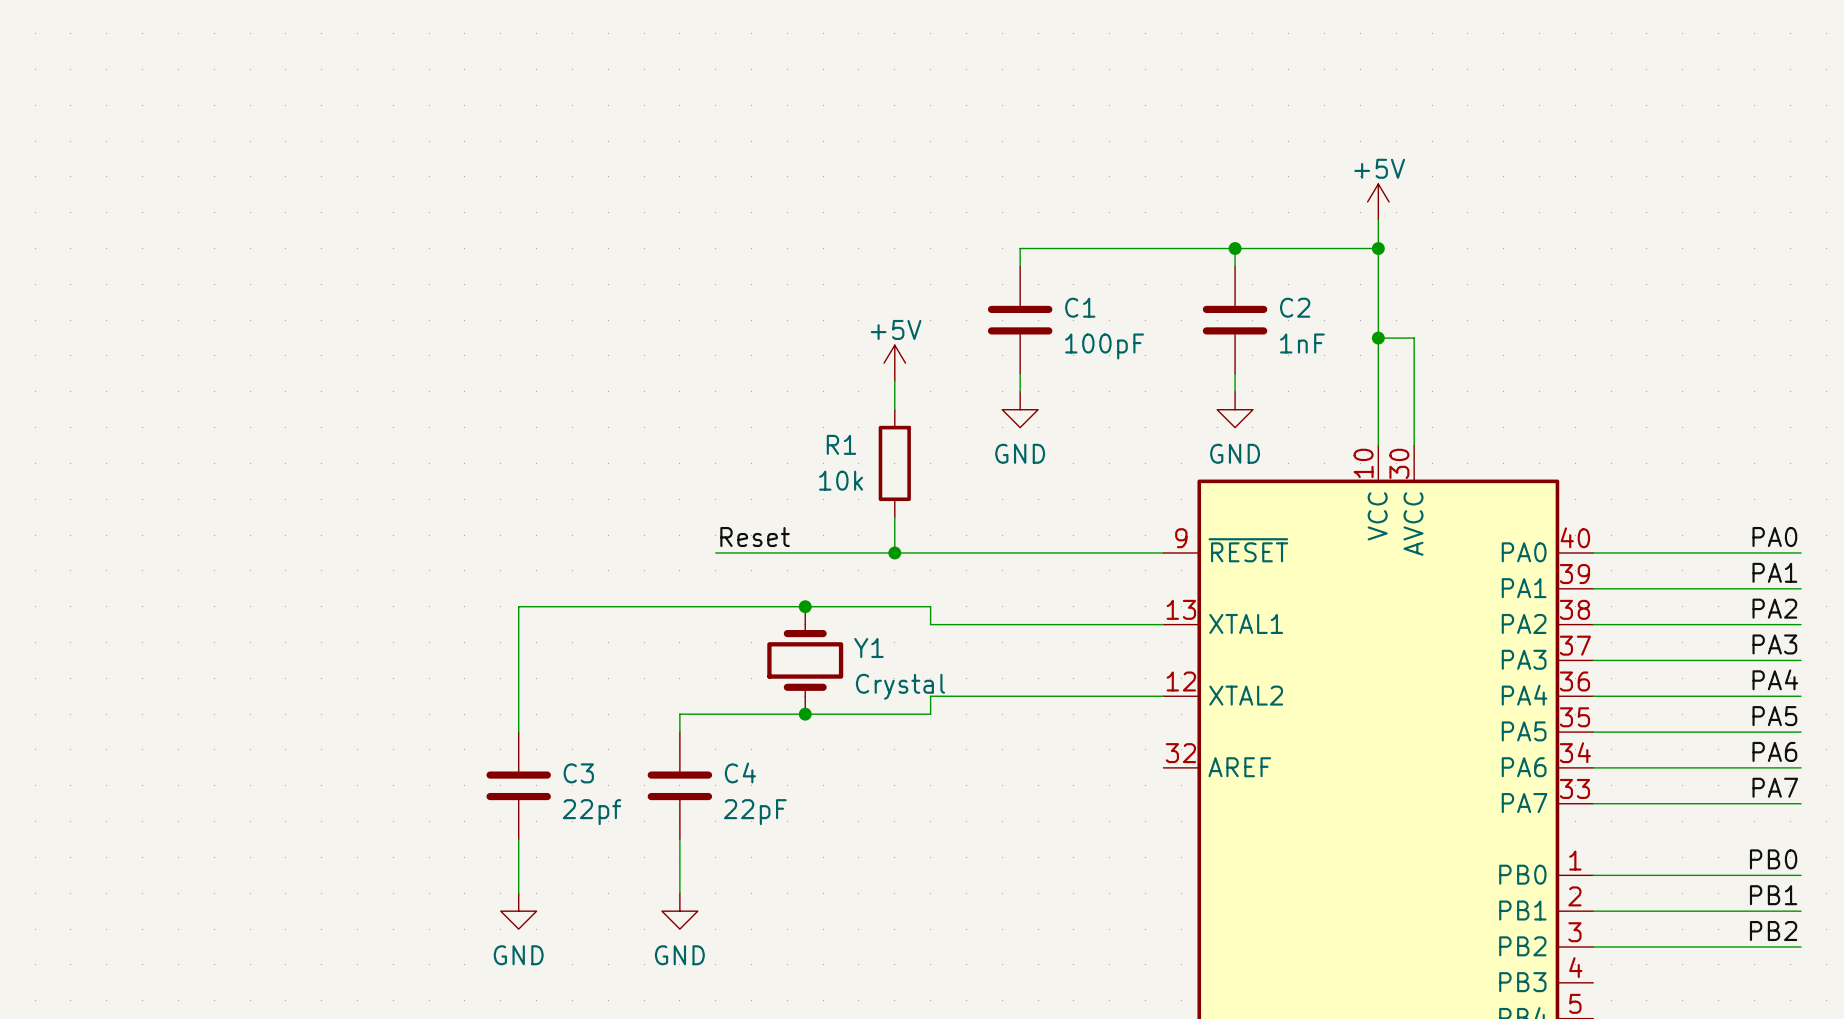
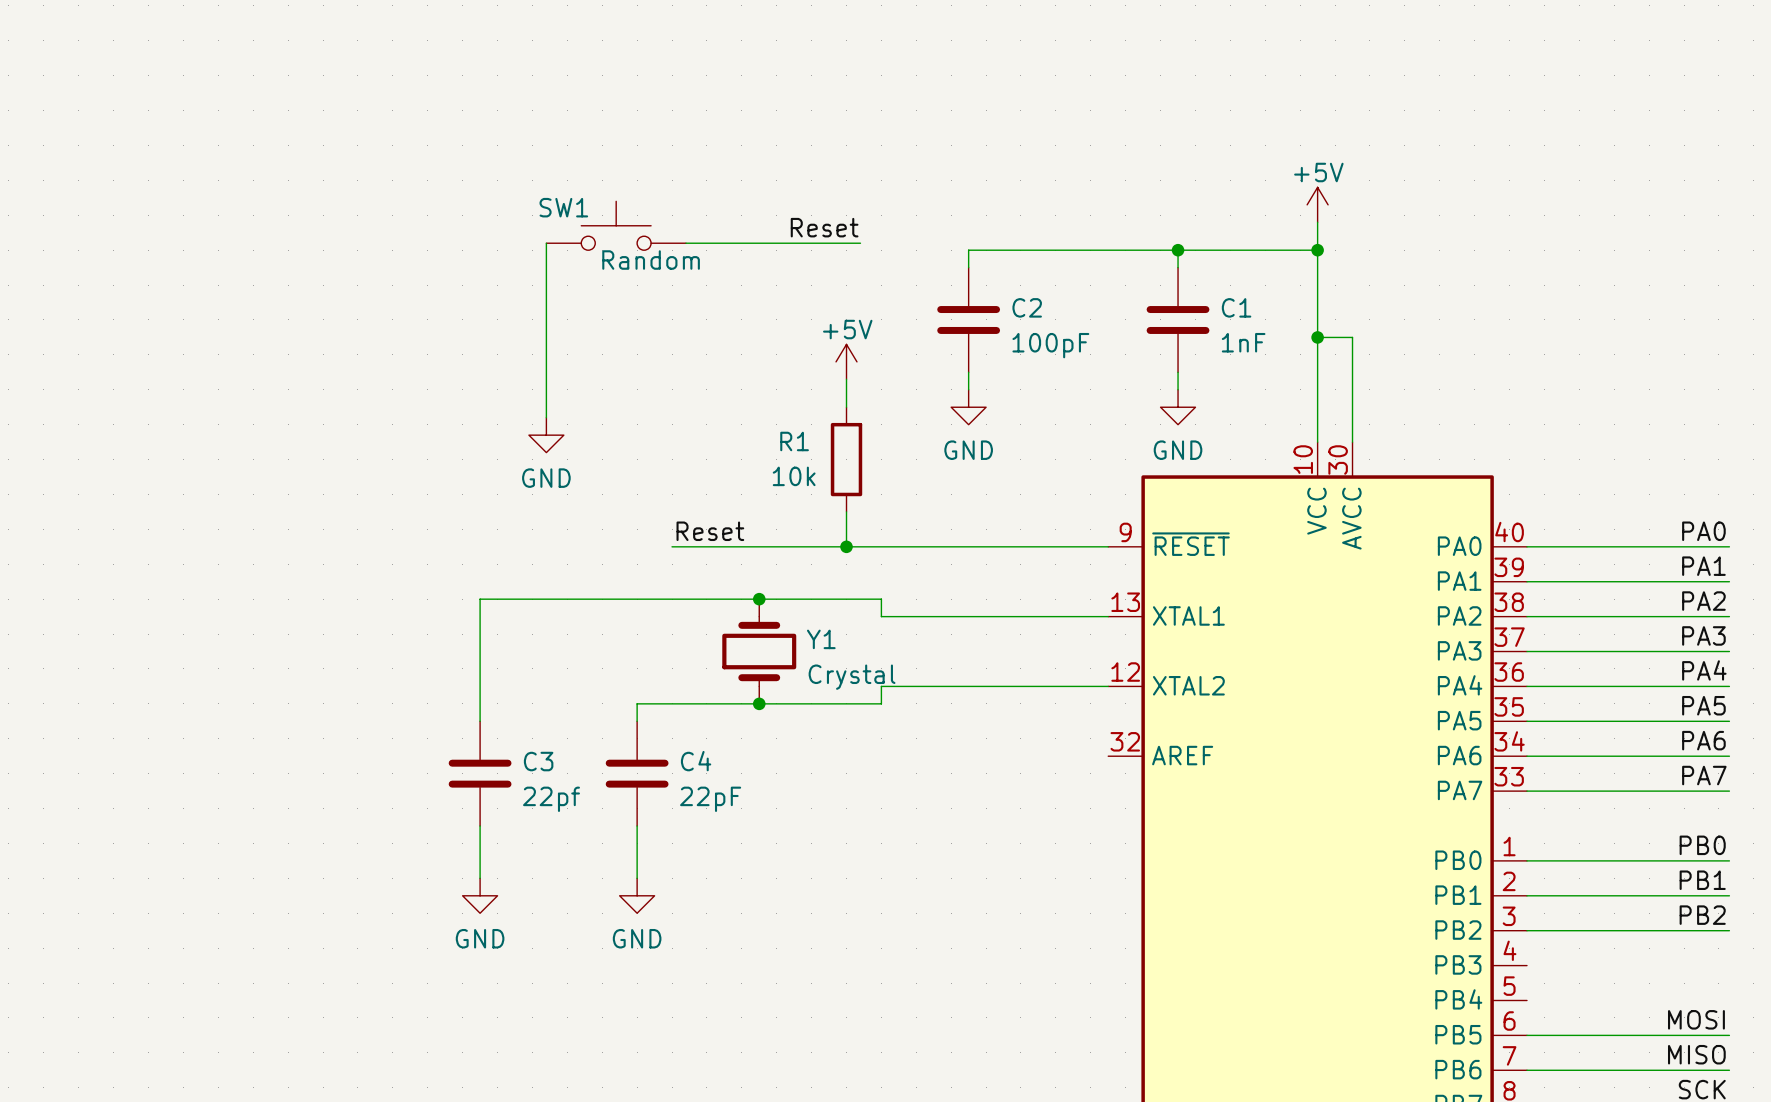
SW1: none -> Random (616, 225)
label: none -> Reset (824, 227)
wire: none -> (546, 243) (546, 417)
wire: none -> (685, 243) (860, 243)
C1 name: C1 (1080, 307) -> C2 (1027, 307)
C2 name: C2 (1295, 307) -> C1 (1236, 307)
power symbol: none -> GND (546, 435)

